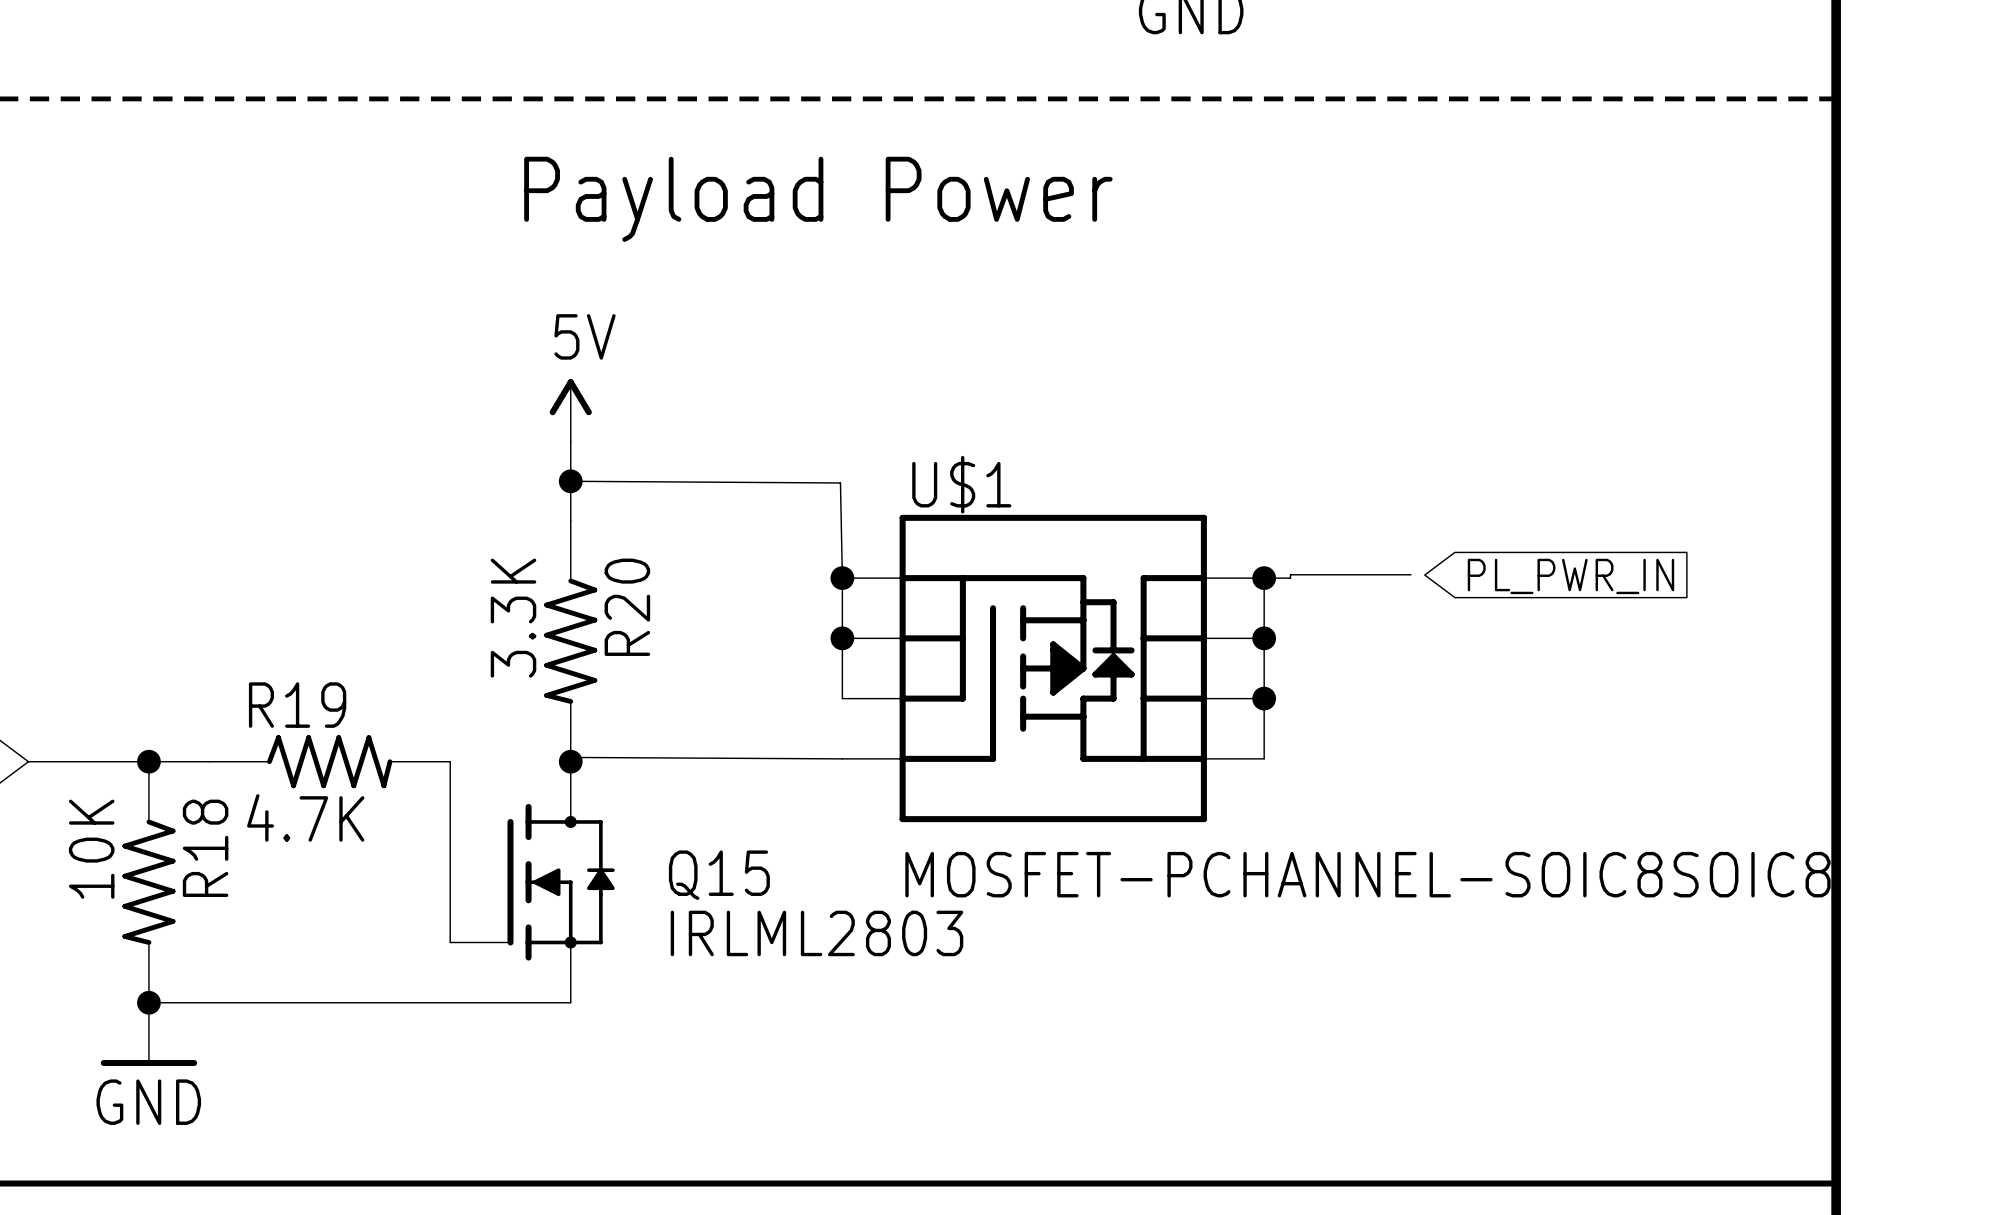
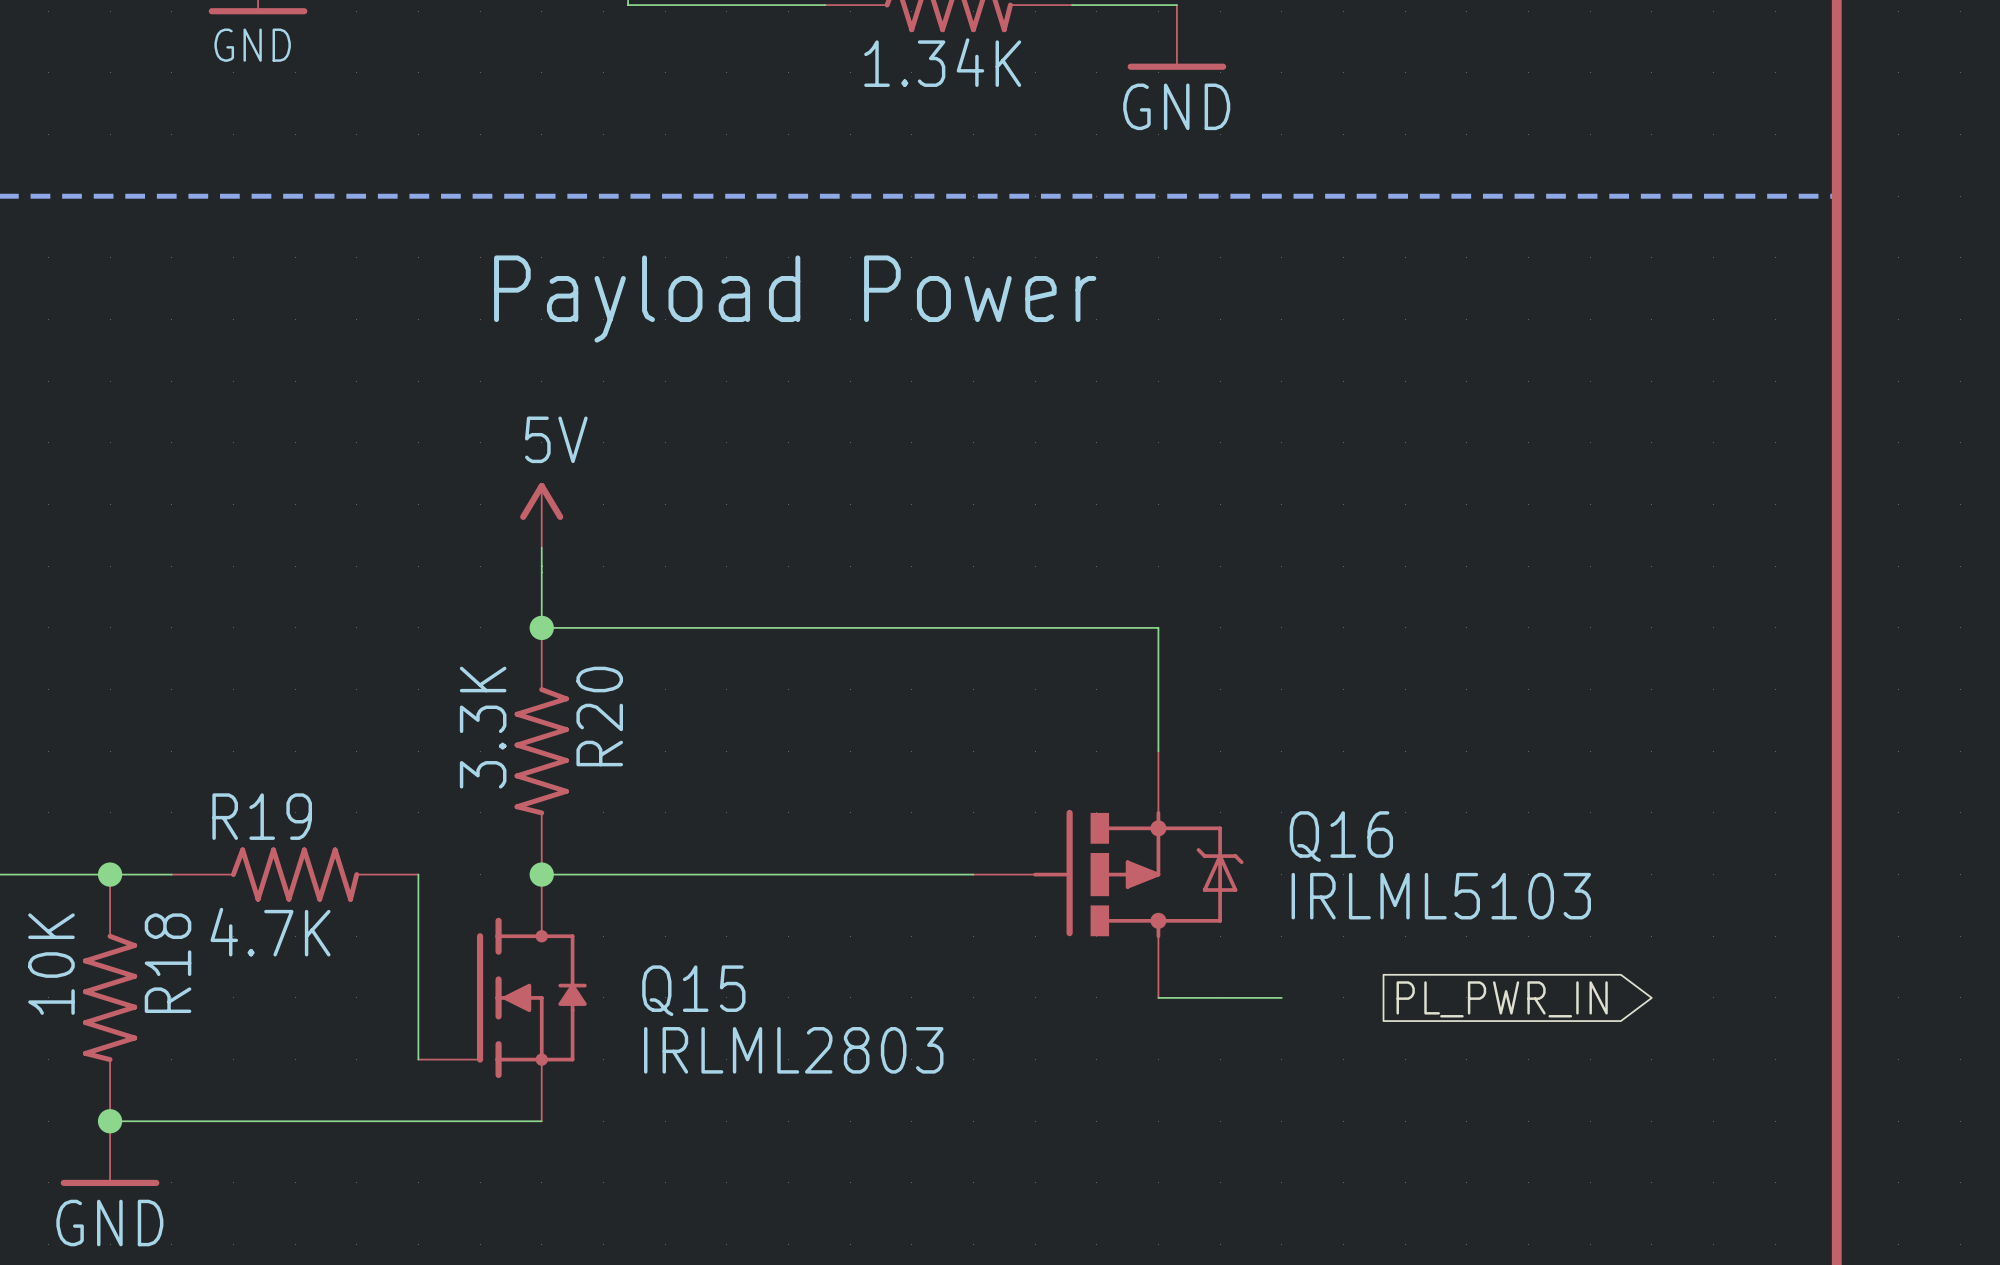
wire: (570, 481) (840, 482) (842, 698) -> none
junction position: (570, 481) -> (541, 627)
wire: none -> (541, 627) (1158, 627) (1158, 751)
wire: (1411, 574) (1290, 574) (1290, 578) (1264, 578) (1264, 758) -> none
global label rotation: 0° (1570, 576) -> 180° (1502, 999)
junction: (842, 578) -> none
junction: (1264, 578) -> none
junction: (842, 638) -> none
junction: (1264, 638) -> none
U$1: MOSFET-PCHANNEL-SOIC8SOIC8 (1053, 668) -> none
junction: (1264, 698) -> none
wire: (842, 758) (570, 757) (570, 761) -> (973, 874) (541, 874)
Q16: none -> IRLML5103 (1108, 874)
wire: none -> (1158, 997) (1281, 997)

